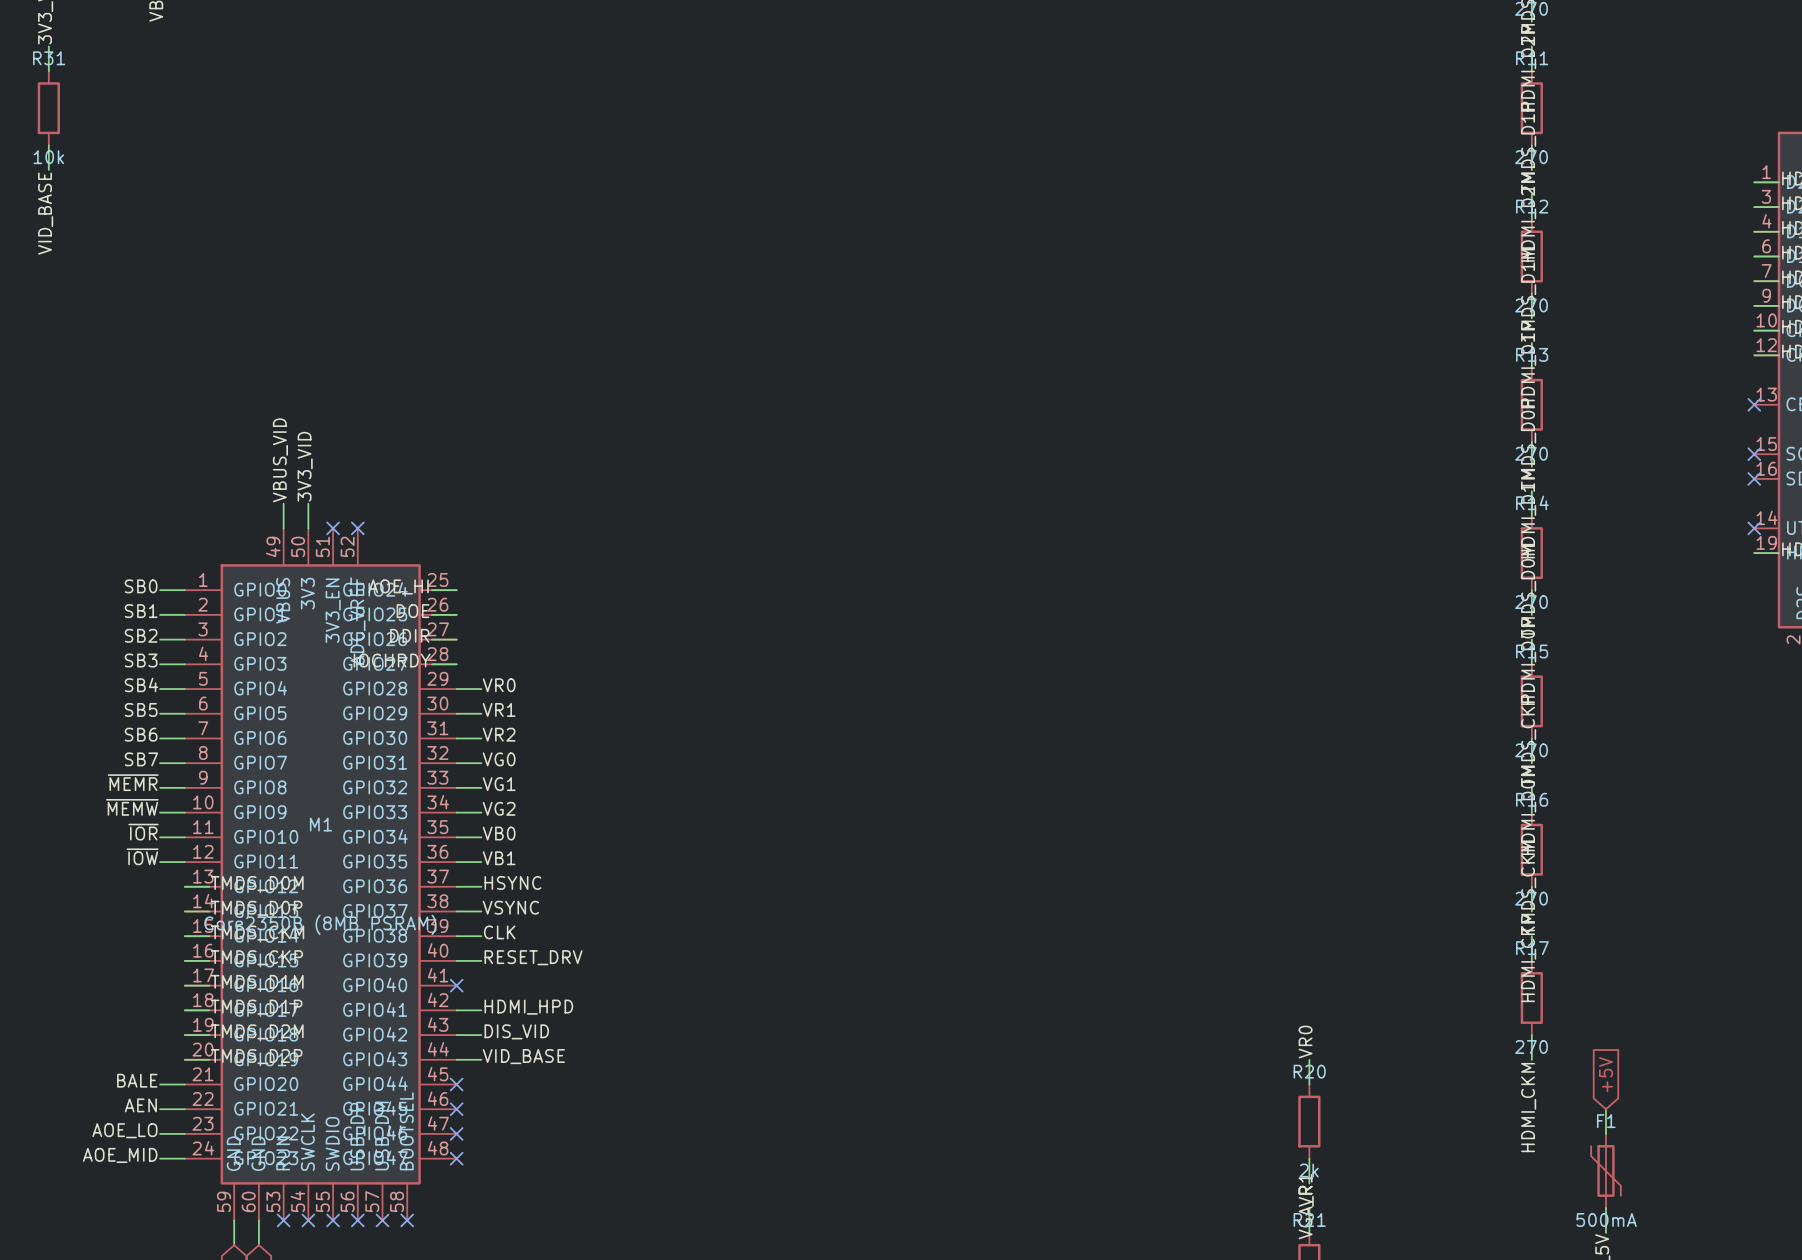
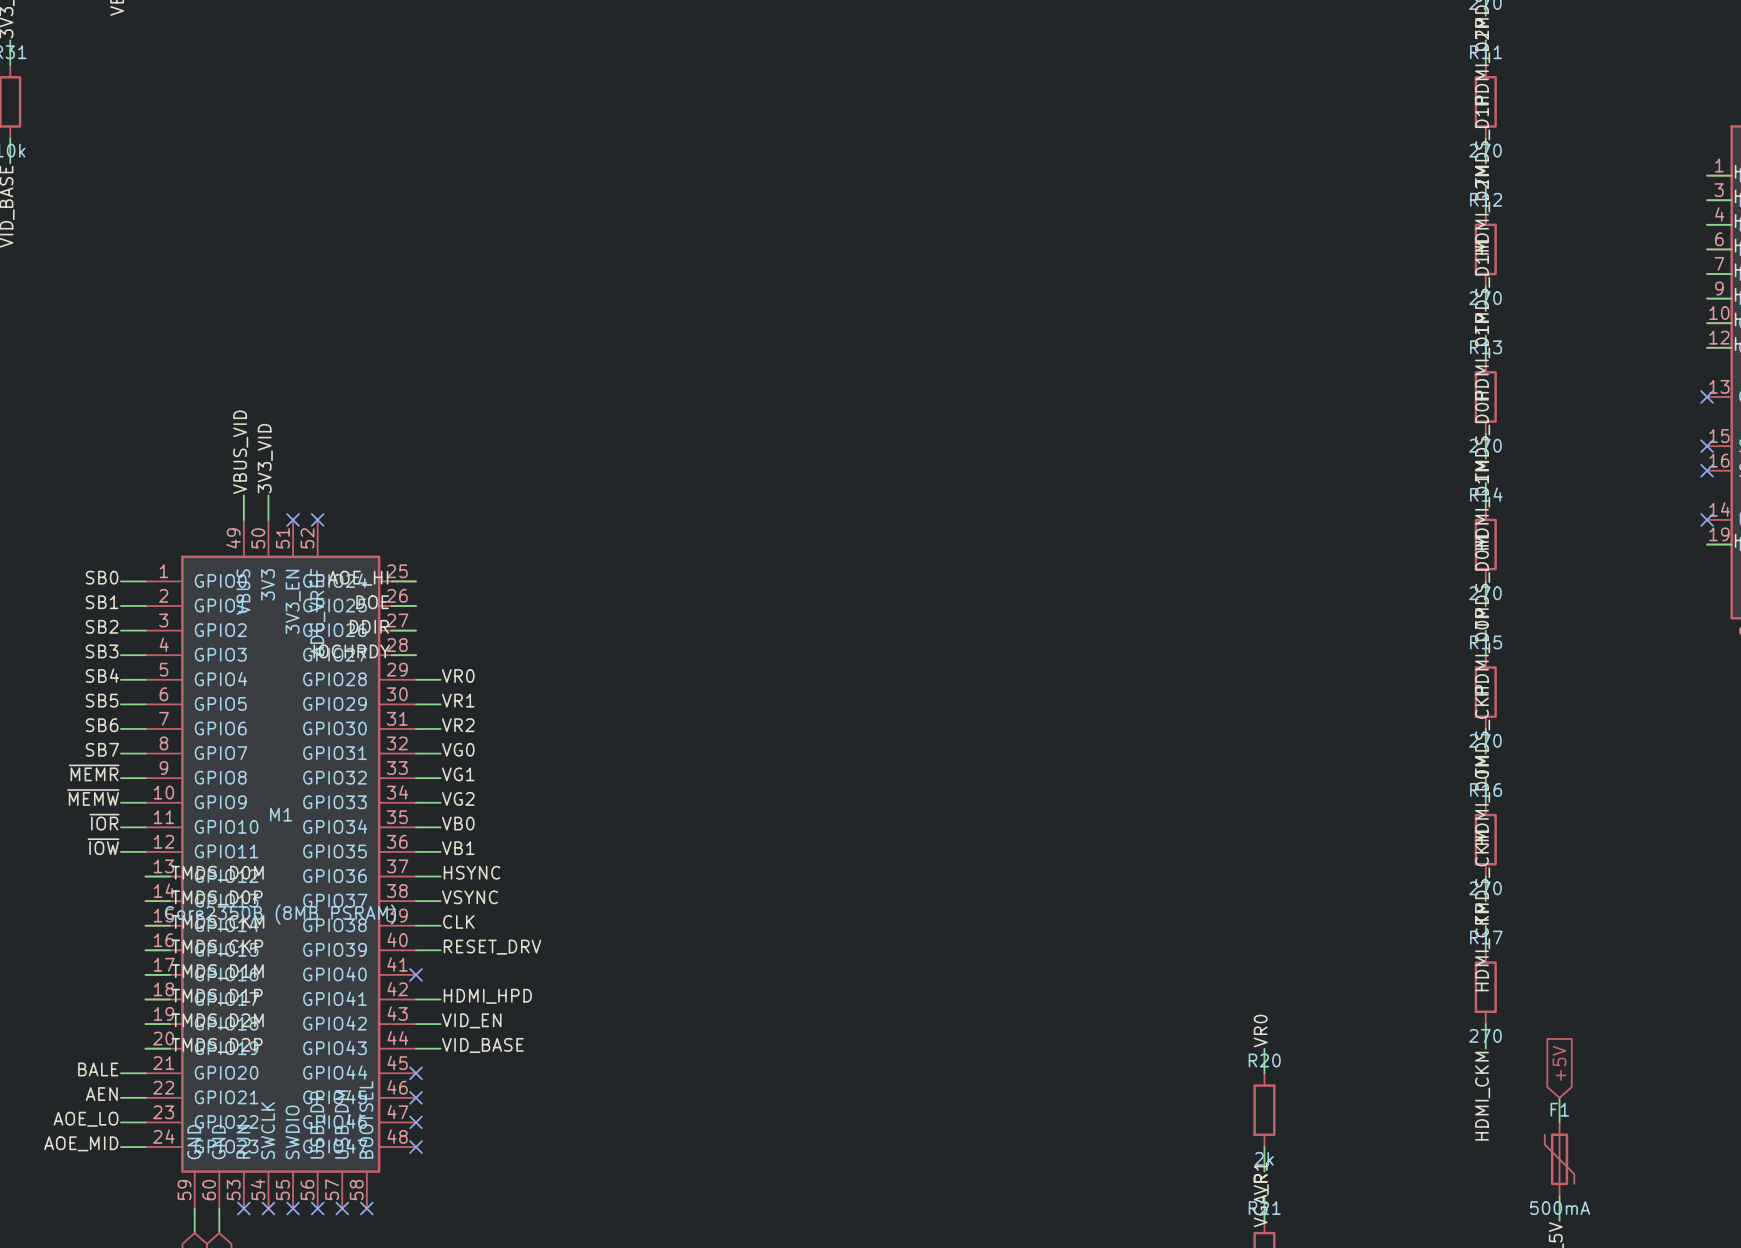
label: DIS_VID (516, 1031) -> VID_EN (471, 1020)

